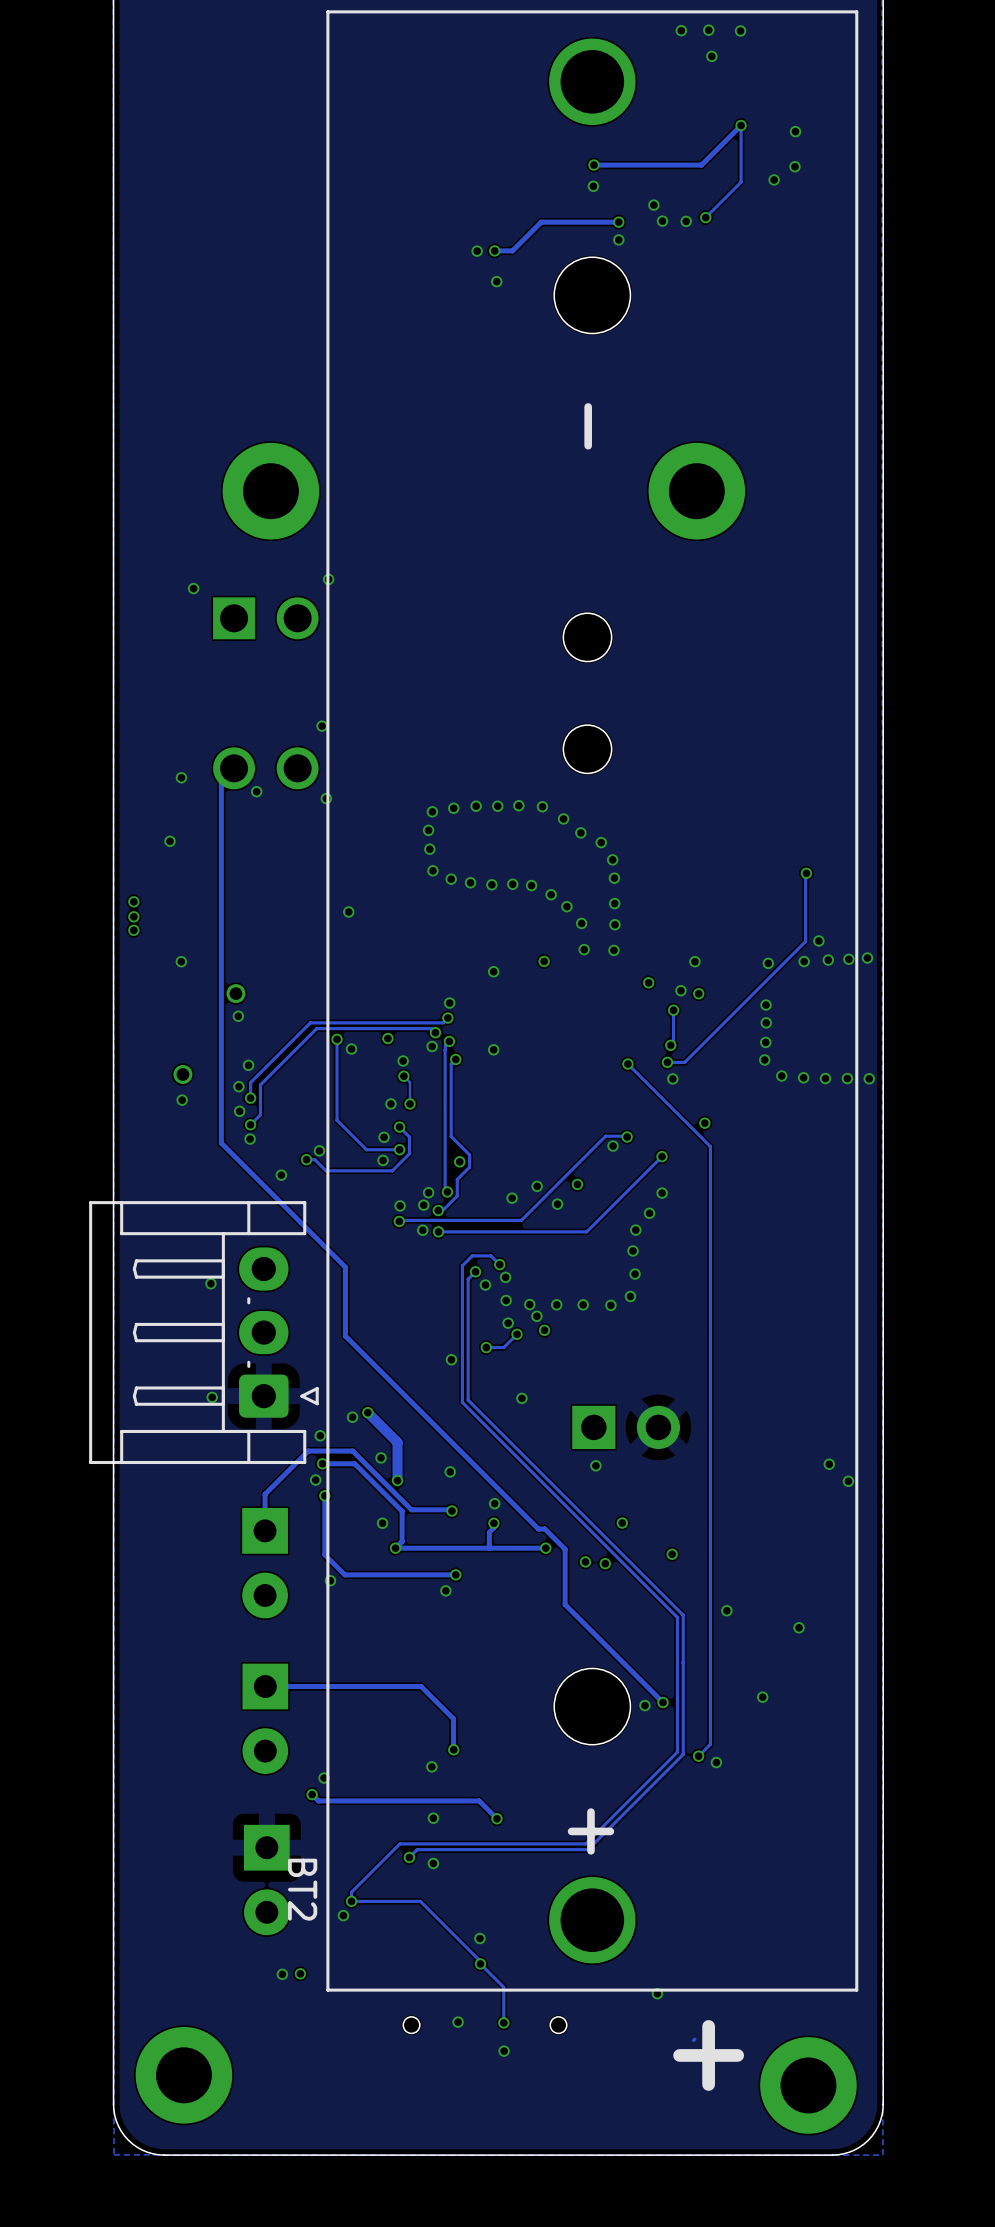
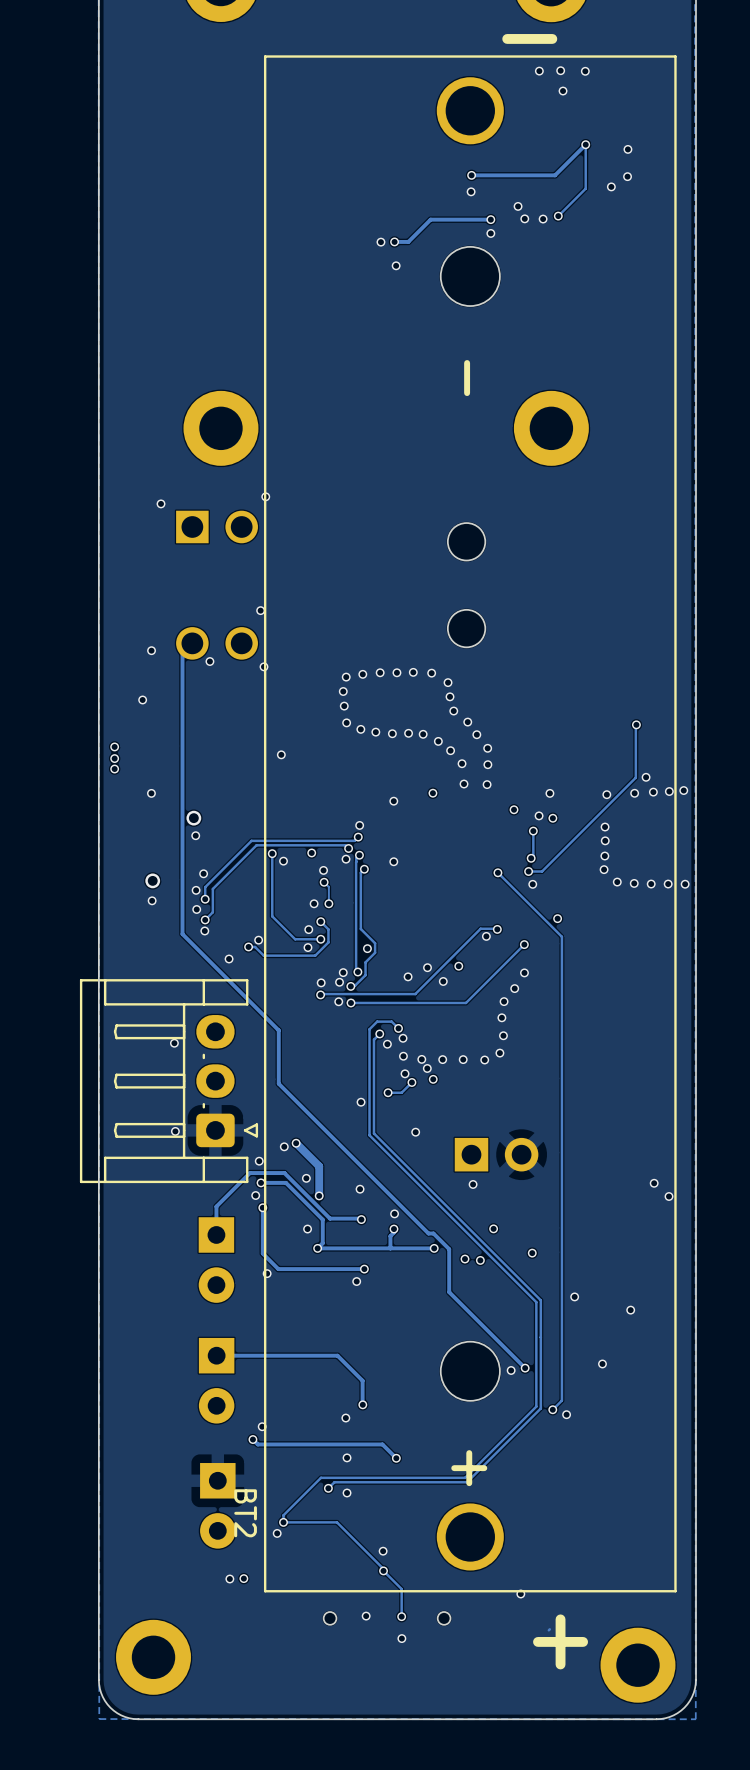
via: (580, 832) -> none
via: none -> (450, 696)
via: (601, 842) -> none
via: none -> (453, 711)
via: (612, 859) -> none
via: none -> (467, 722)
via: (614, 878) -> none
via: none -> (476, 734)

